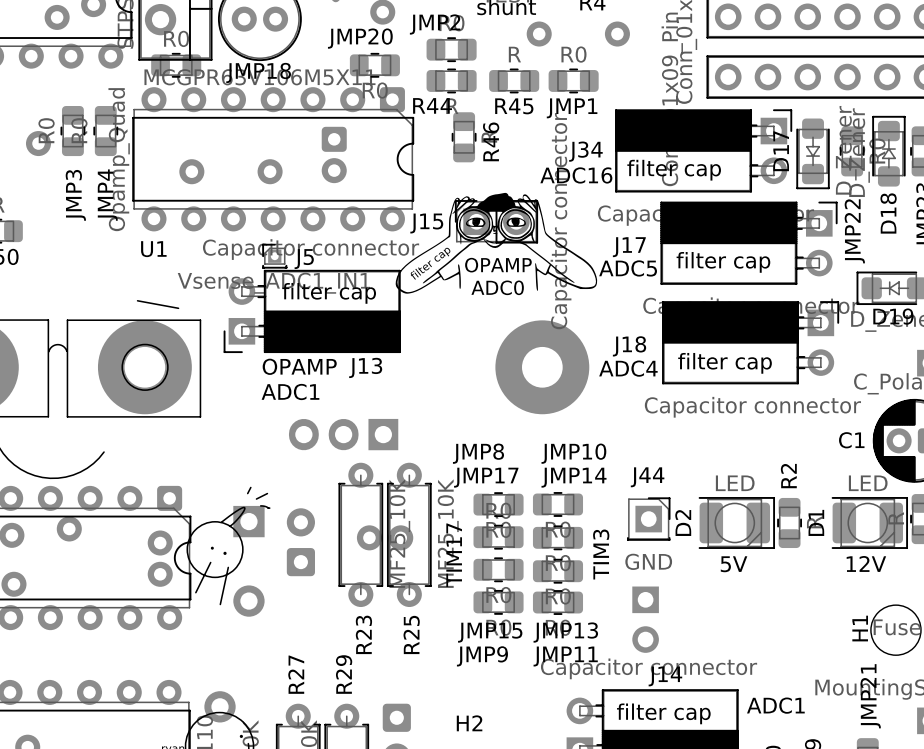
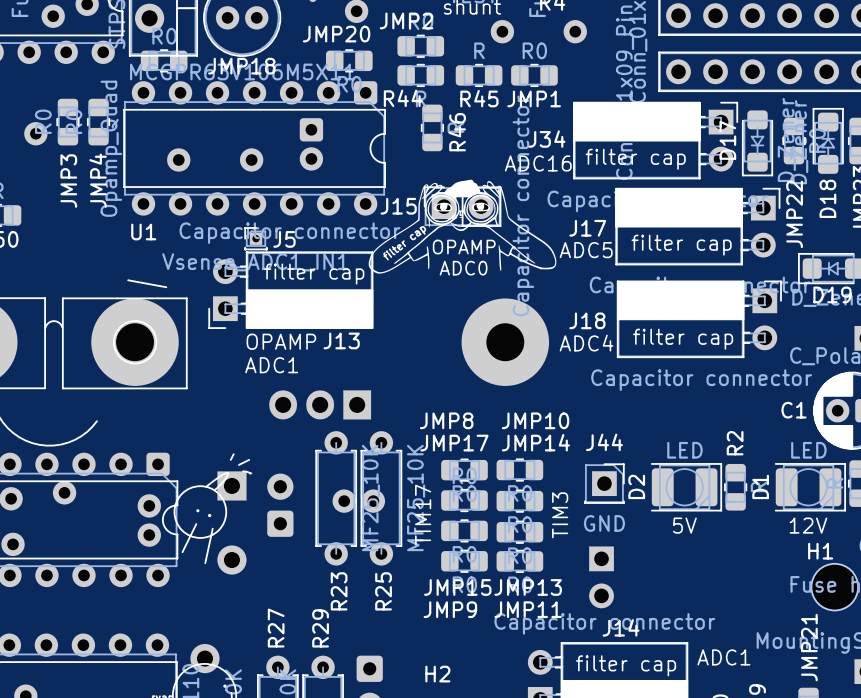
H1 name rotation: 0° (860, 628) -> 90° clockwise (820, 551)
H1 name position: H1 (860, 628) -> H1 (820, 551)

